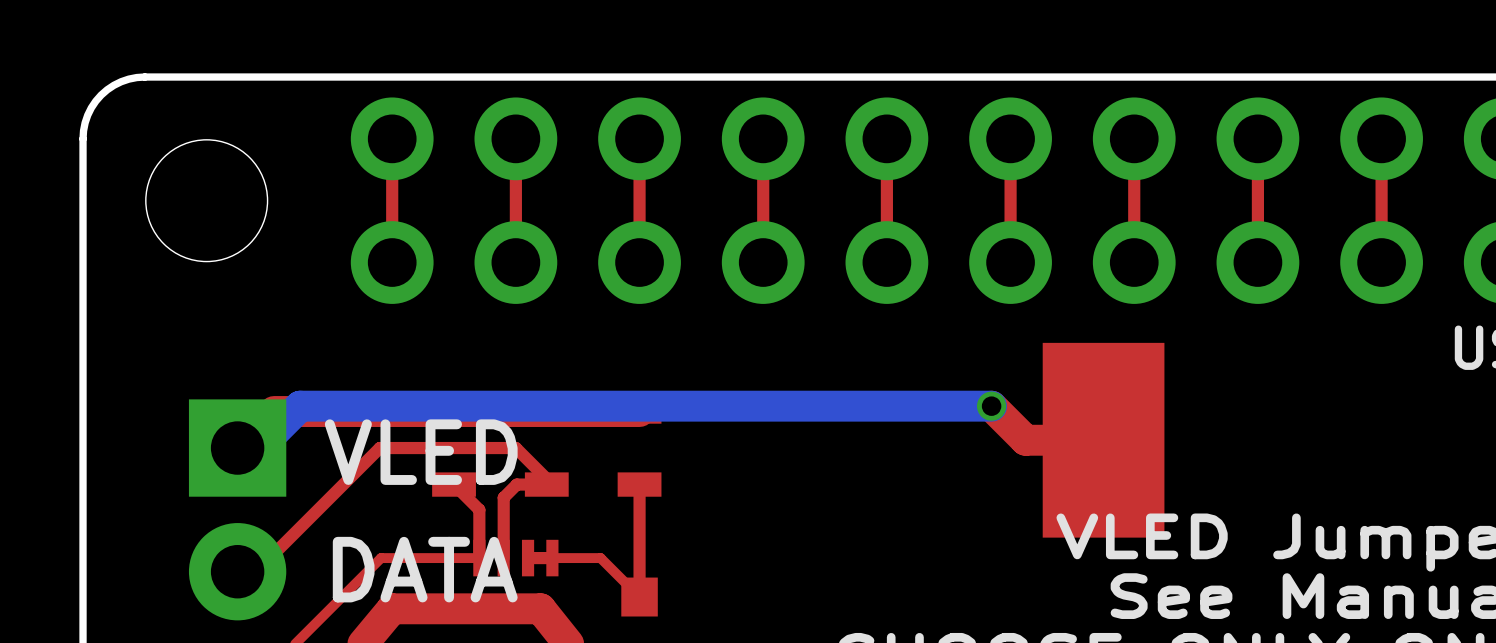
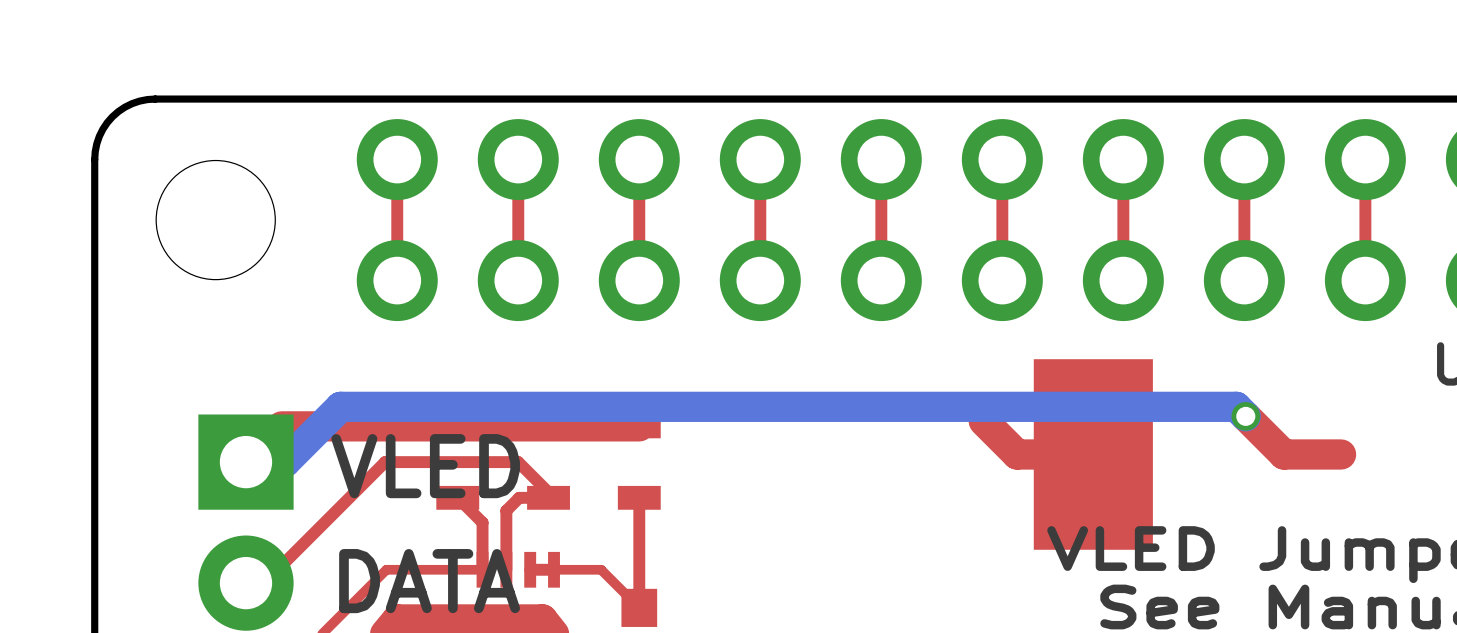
top track: none -> (1245, 416) (1283, 454) (1341, 454)
via: none -> (1245, 416)
bottom track: (991, 406) (300, 406) (258, 448) -> (1245, 416) (1236, 406) (340, 406) (285, 462) (266, 462)
via: (991, 406) -> none

